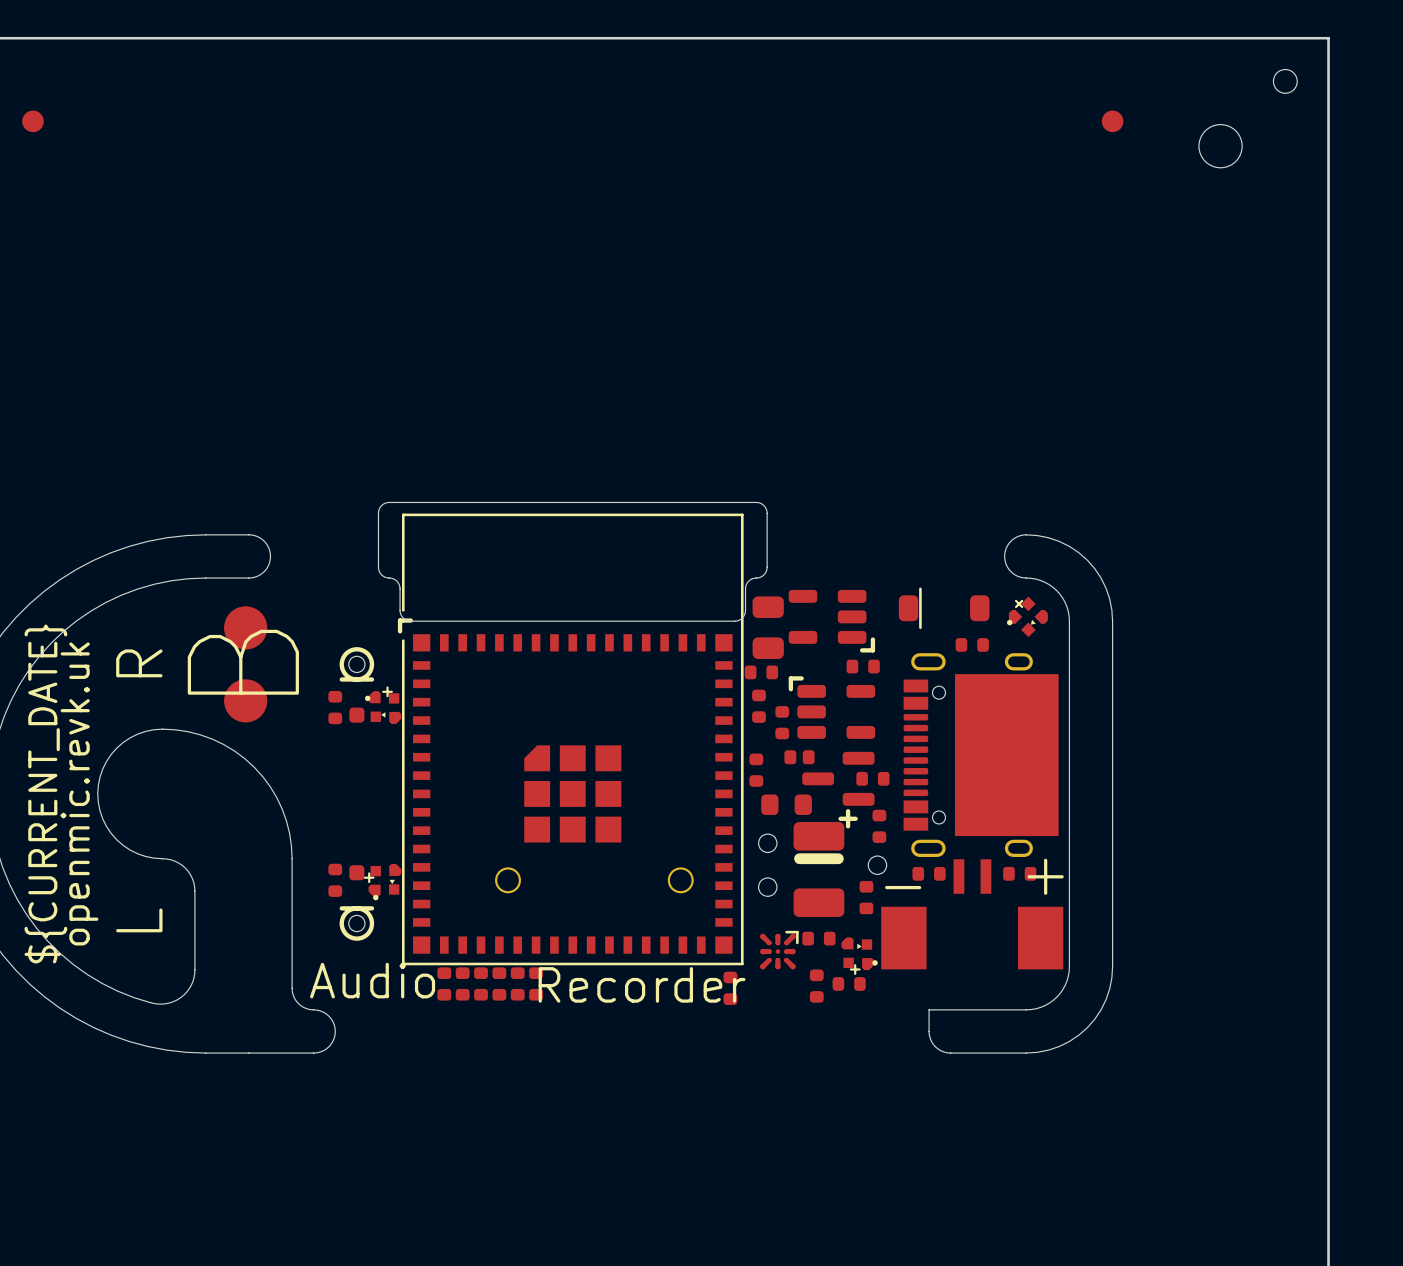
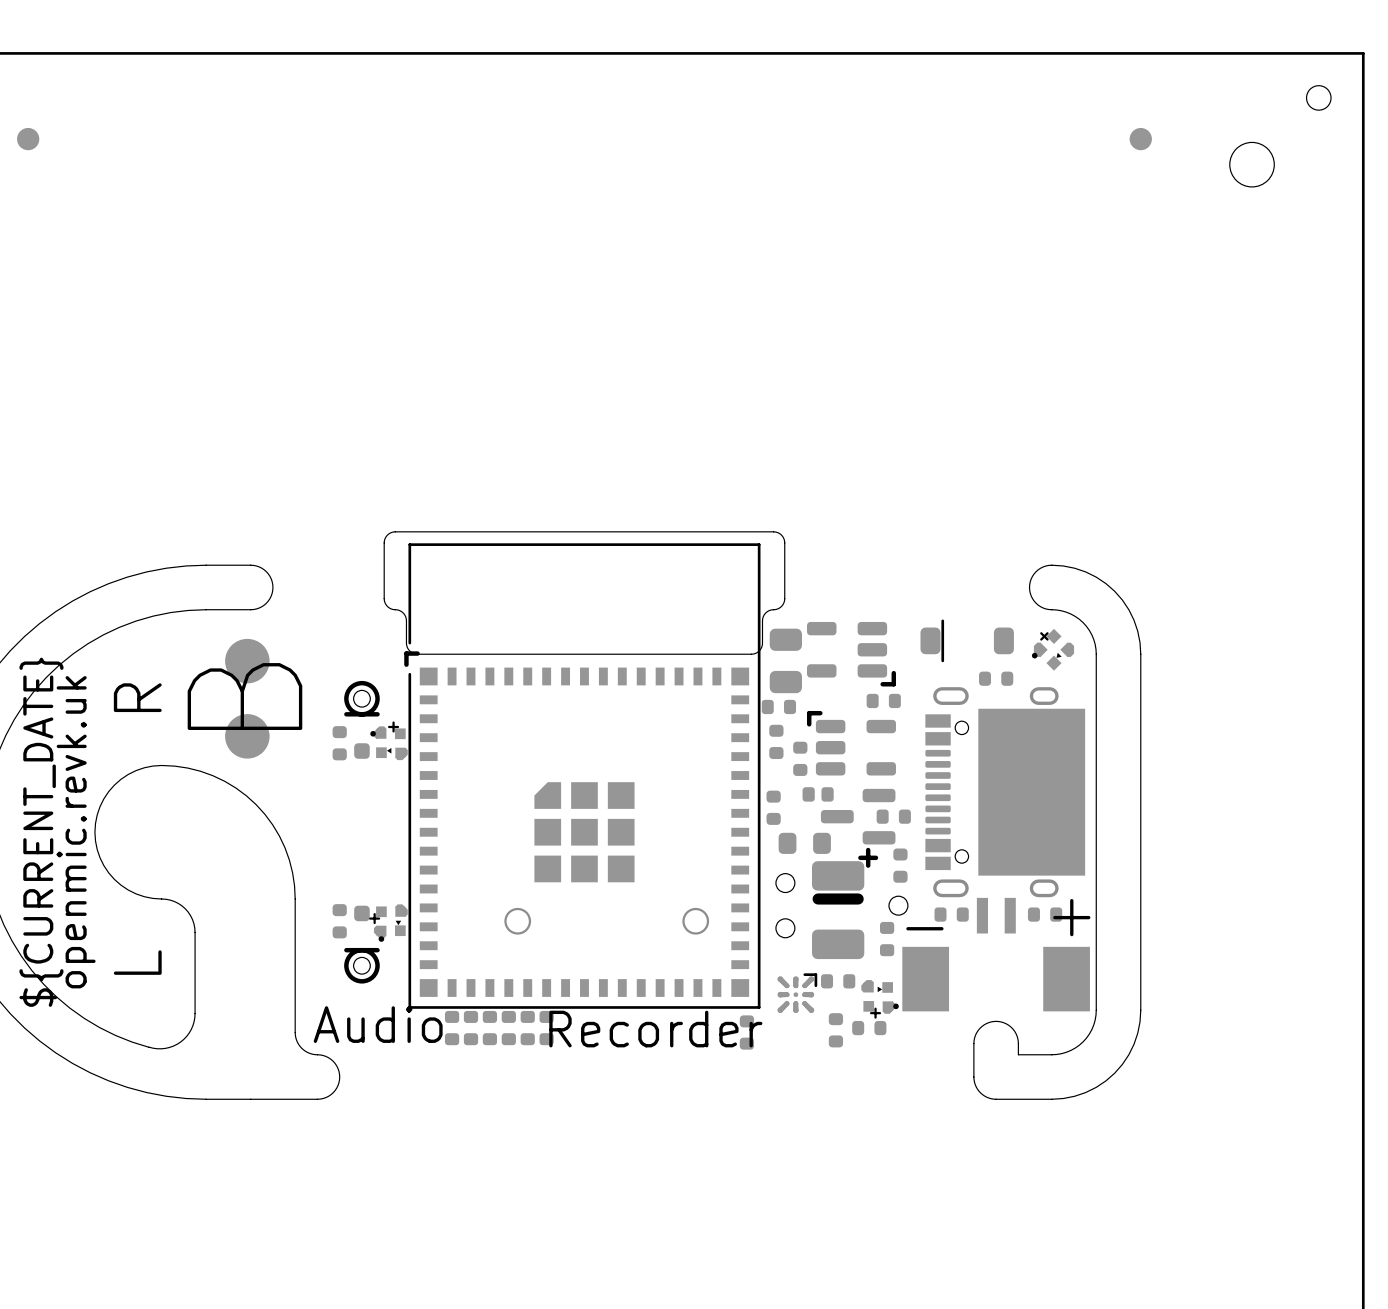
part: none -> (996, 954)
part: (972, 945) -> none
board edge: (993, 1009) (929, 1009) (929, 1036) (935, 1046) (945, 1052) (972, 1053) -> (1018, 1054) (1017, 1036) (1013, 1029) (1005, 1023) (998, 1021) (988, 1022) (980, 1027) (976, 1033) (973, 1043) (975, 1084) (982, 1094) (996, 1099)

